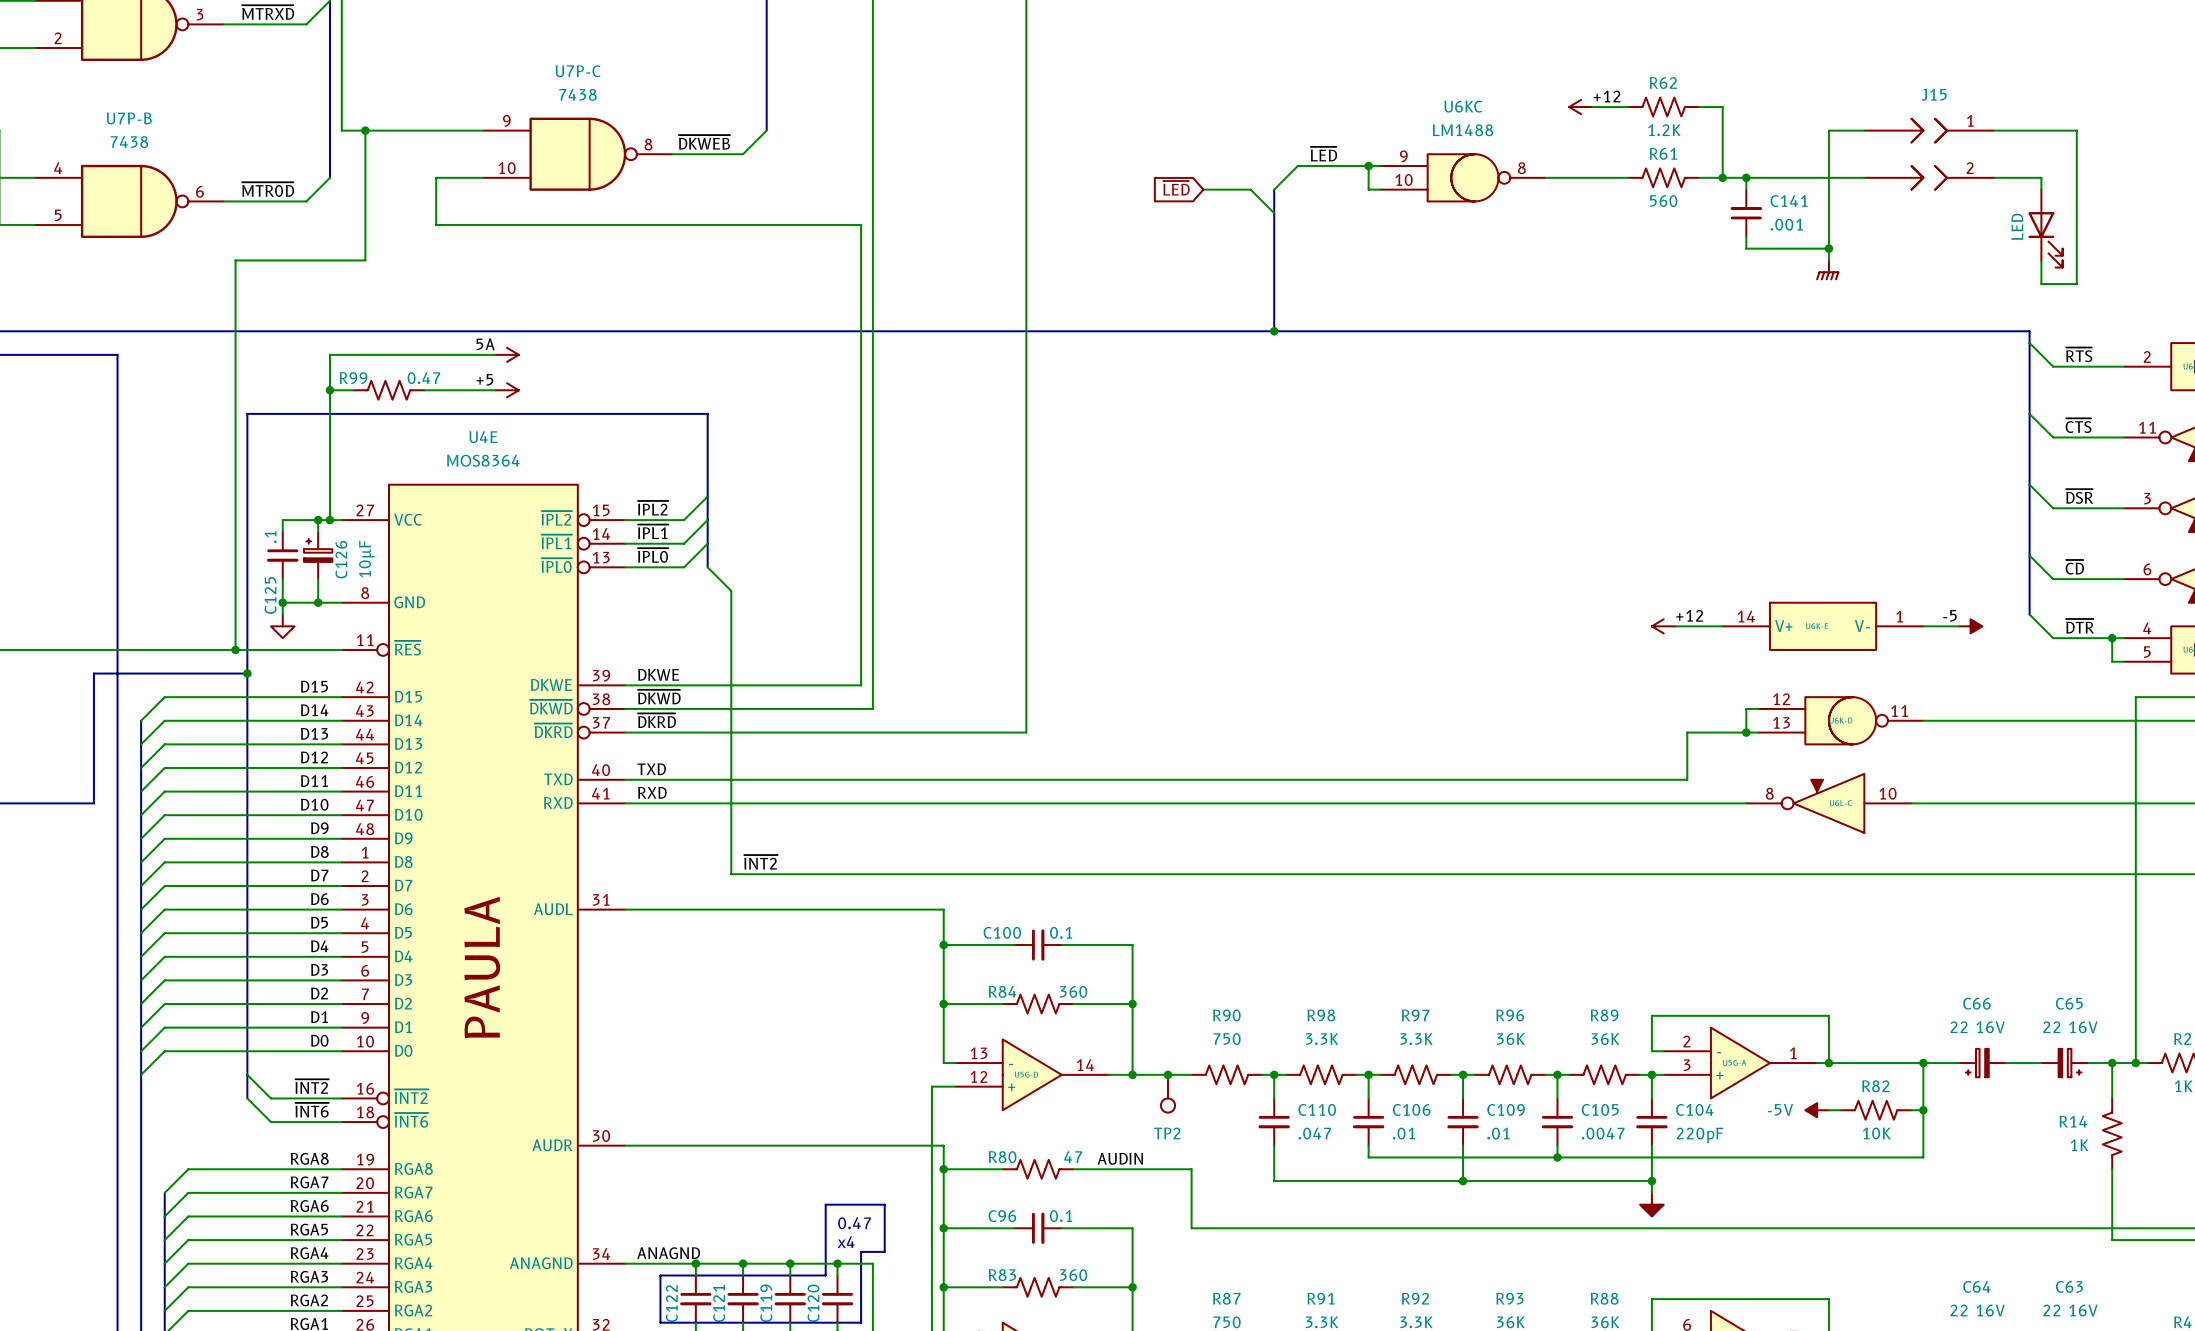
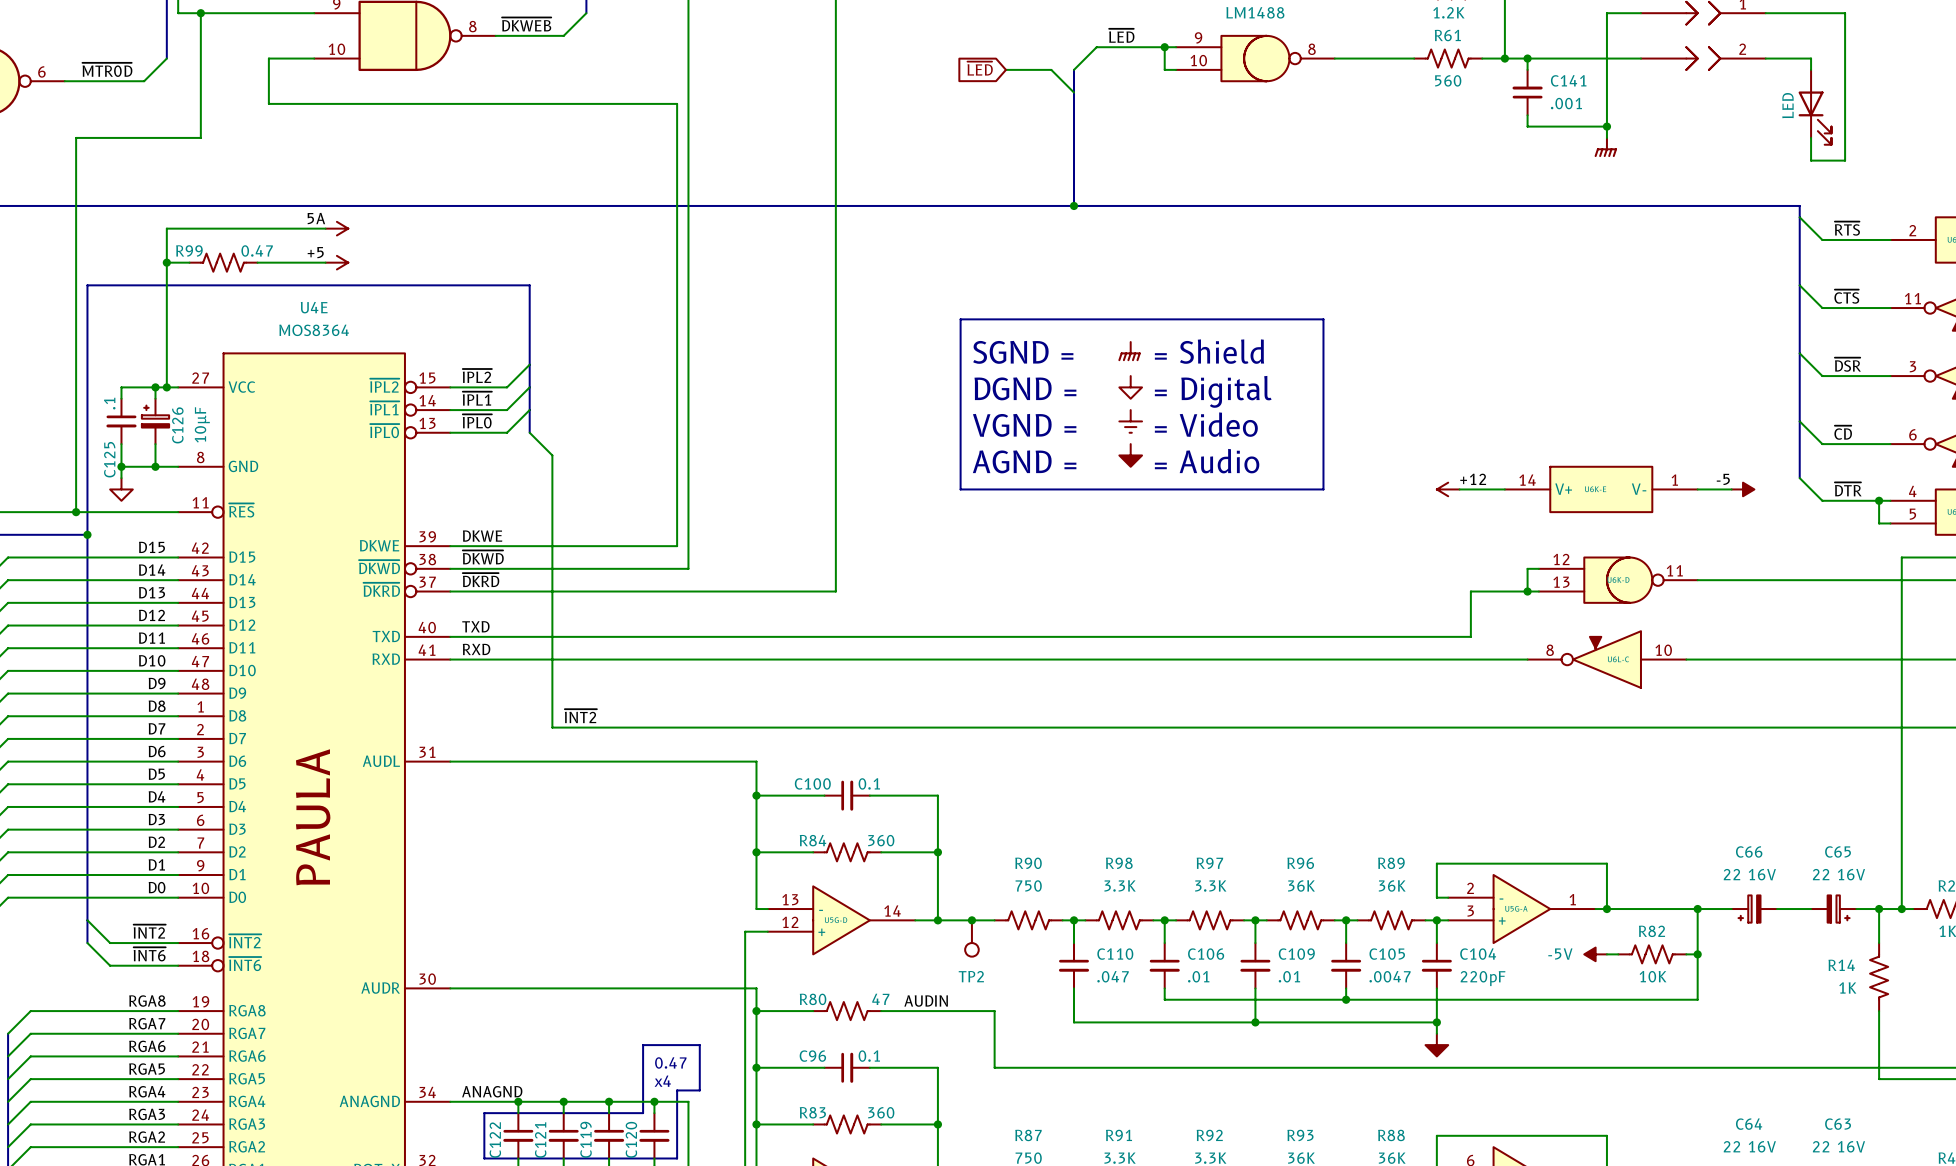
line: none -> (960, 319) (1323, 319) (1323, 489) (960, 489) (960, 319)
power symbol: none -> (1129, 351)
text: none -> = Shield (1209, 351)
text: none -> SGND = (1023, 352)
power symbol: none -> (1130, 387)
text: none -> DGND = (1025, 388)
text: none -> = Digital (1213, 391)
power symbol: none -> (1130, 421)
text: none -> = Video (1206, 424)
text: none -> VGND = (1024, 425)
power symbol: none -> (1130, 455)
text: none -> = Audio (1207, 461)
text: none -> AGND = (1024, 461)

